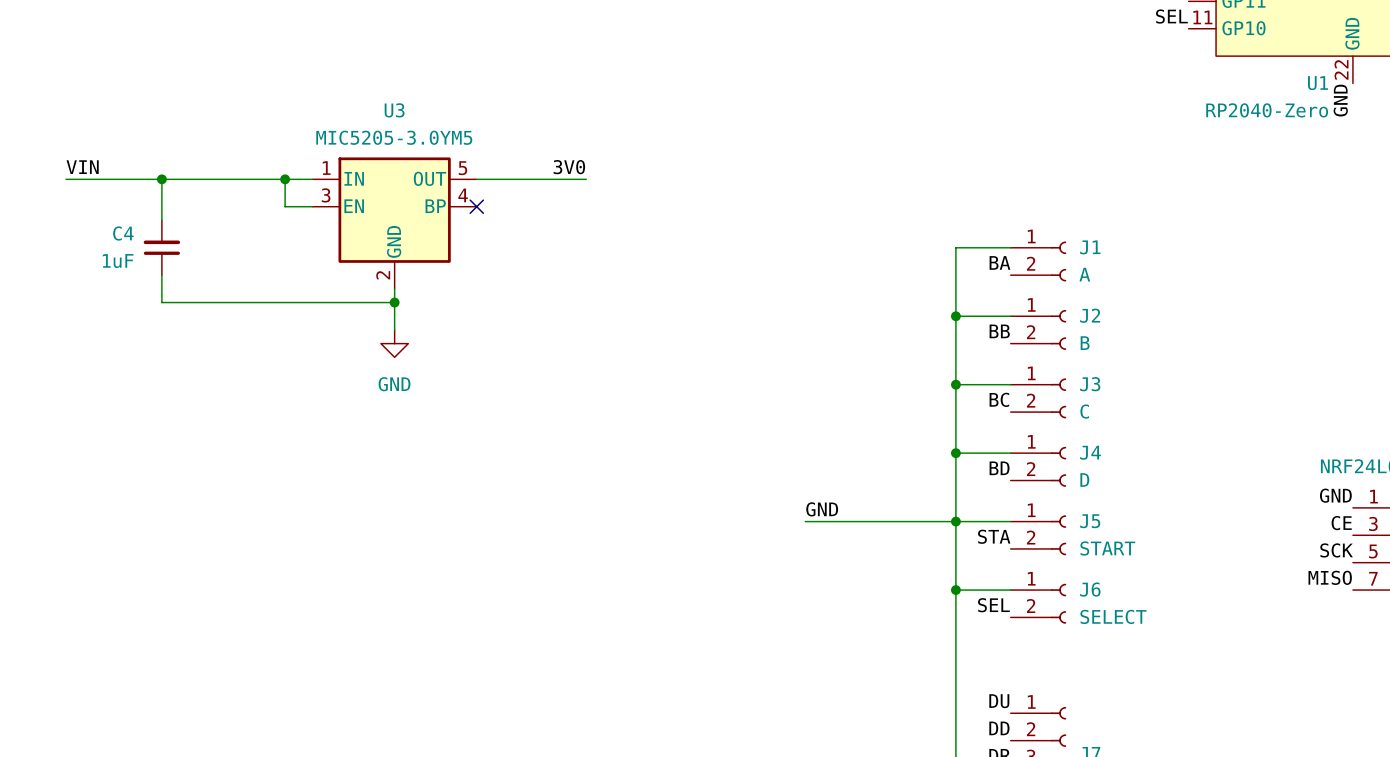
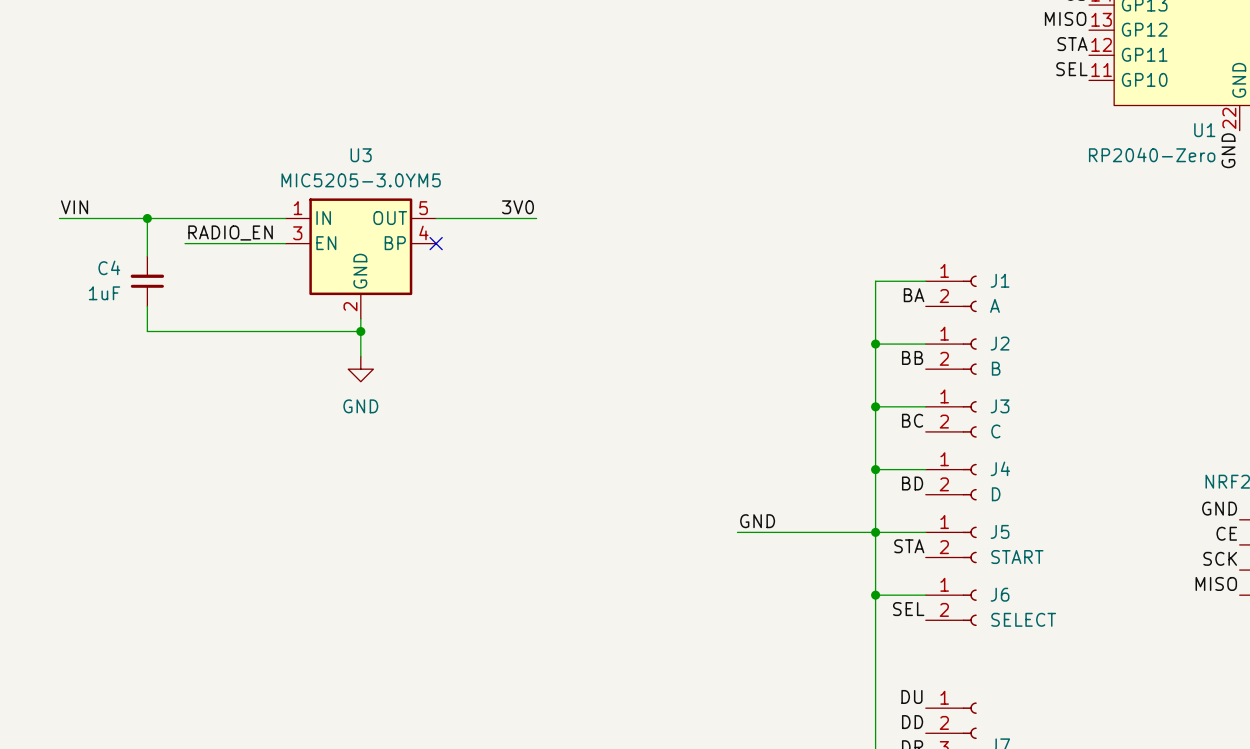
wire: (285, 179) (285, 206) -> (185, 243) (260, 243)
junction: (285, 179) -> none
label: none -> RADIO_EN (230, 233)

